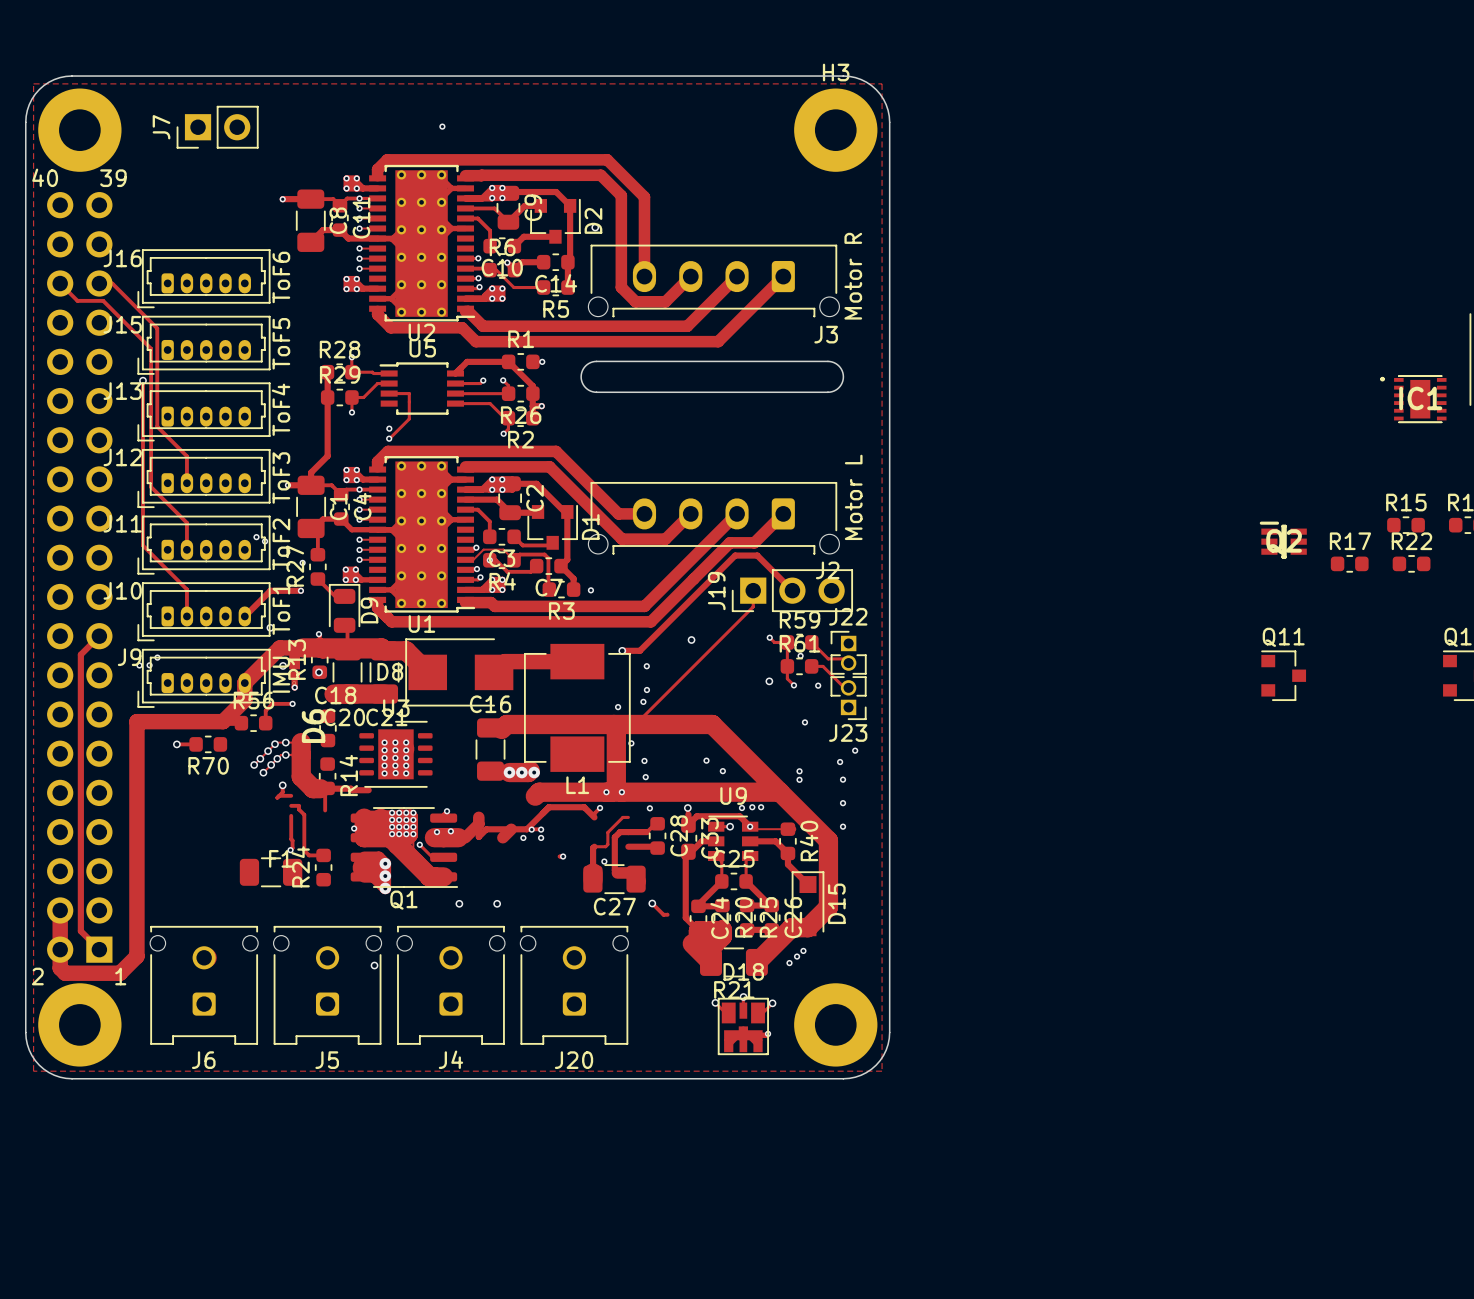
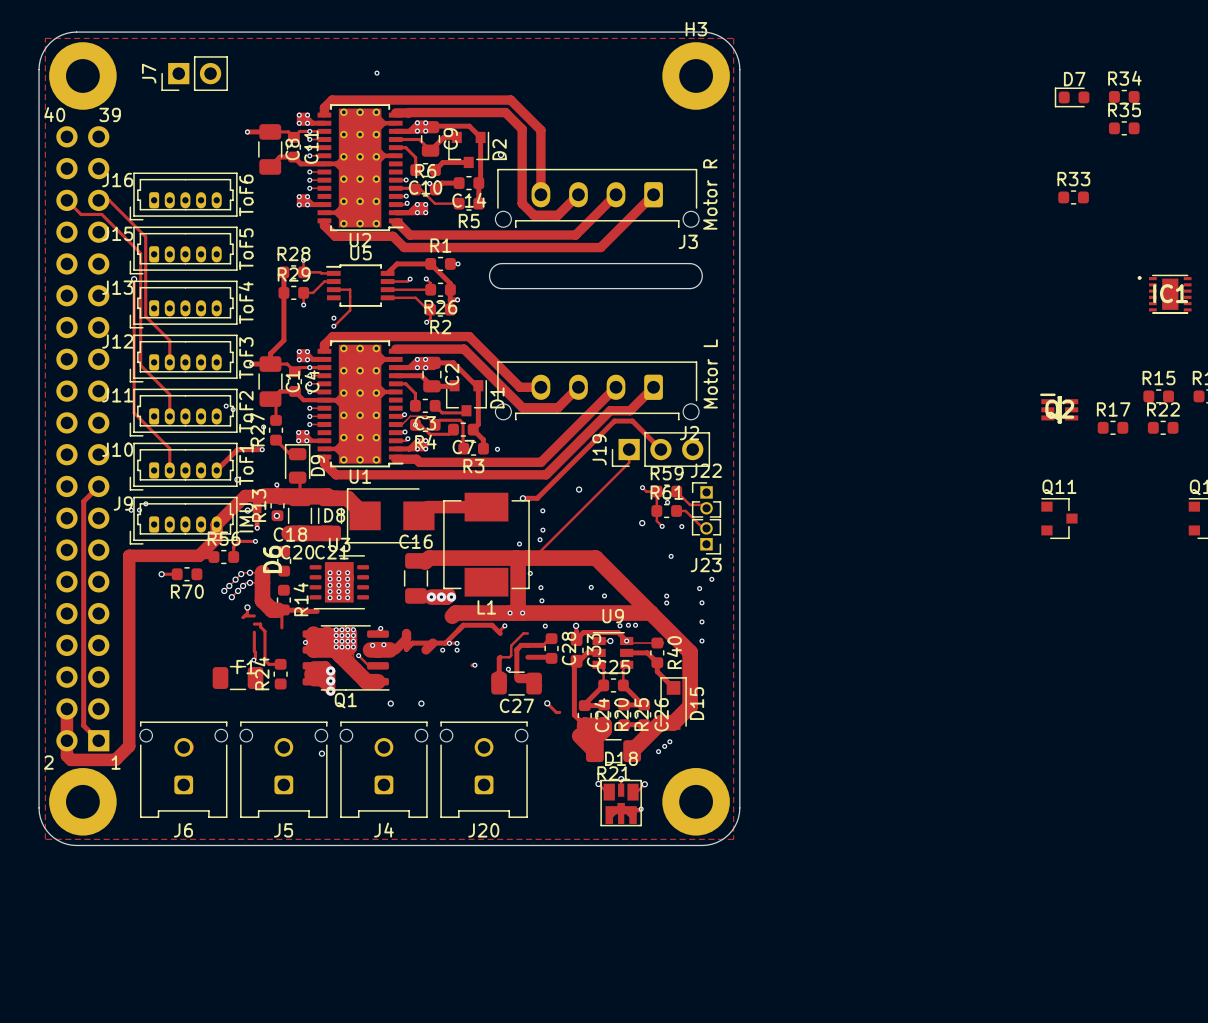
D7: none -> (1072, 97)
R34: none -> (1124, 96)
R35: none -> (1124, 128)
R33: none -> (1073, 197)

